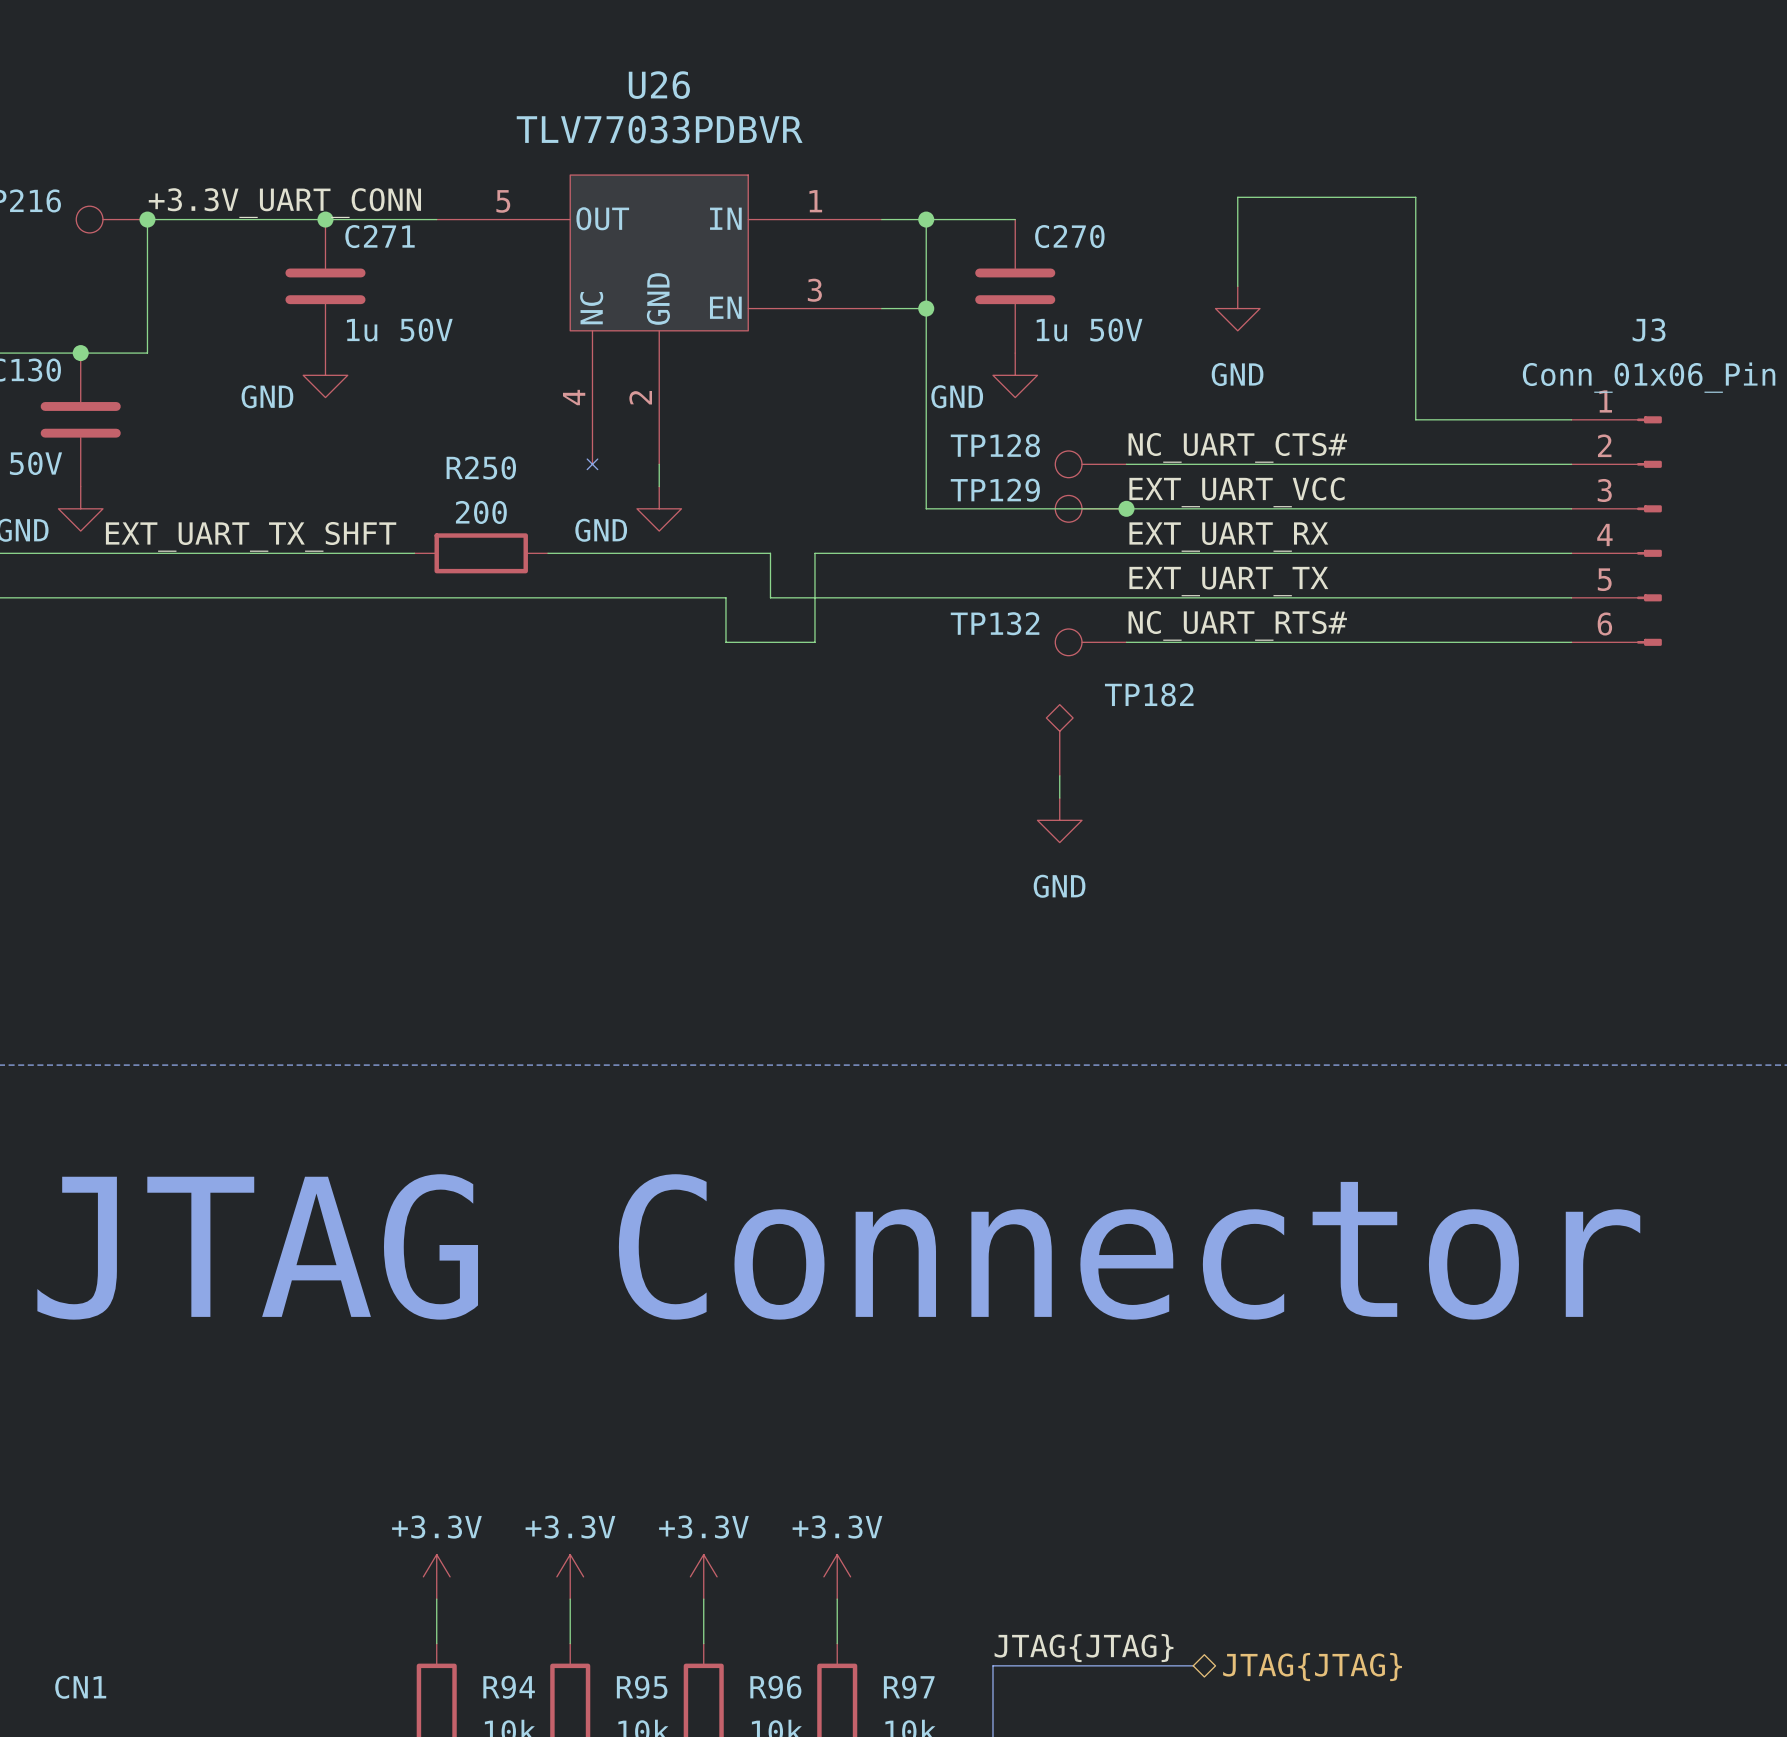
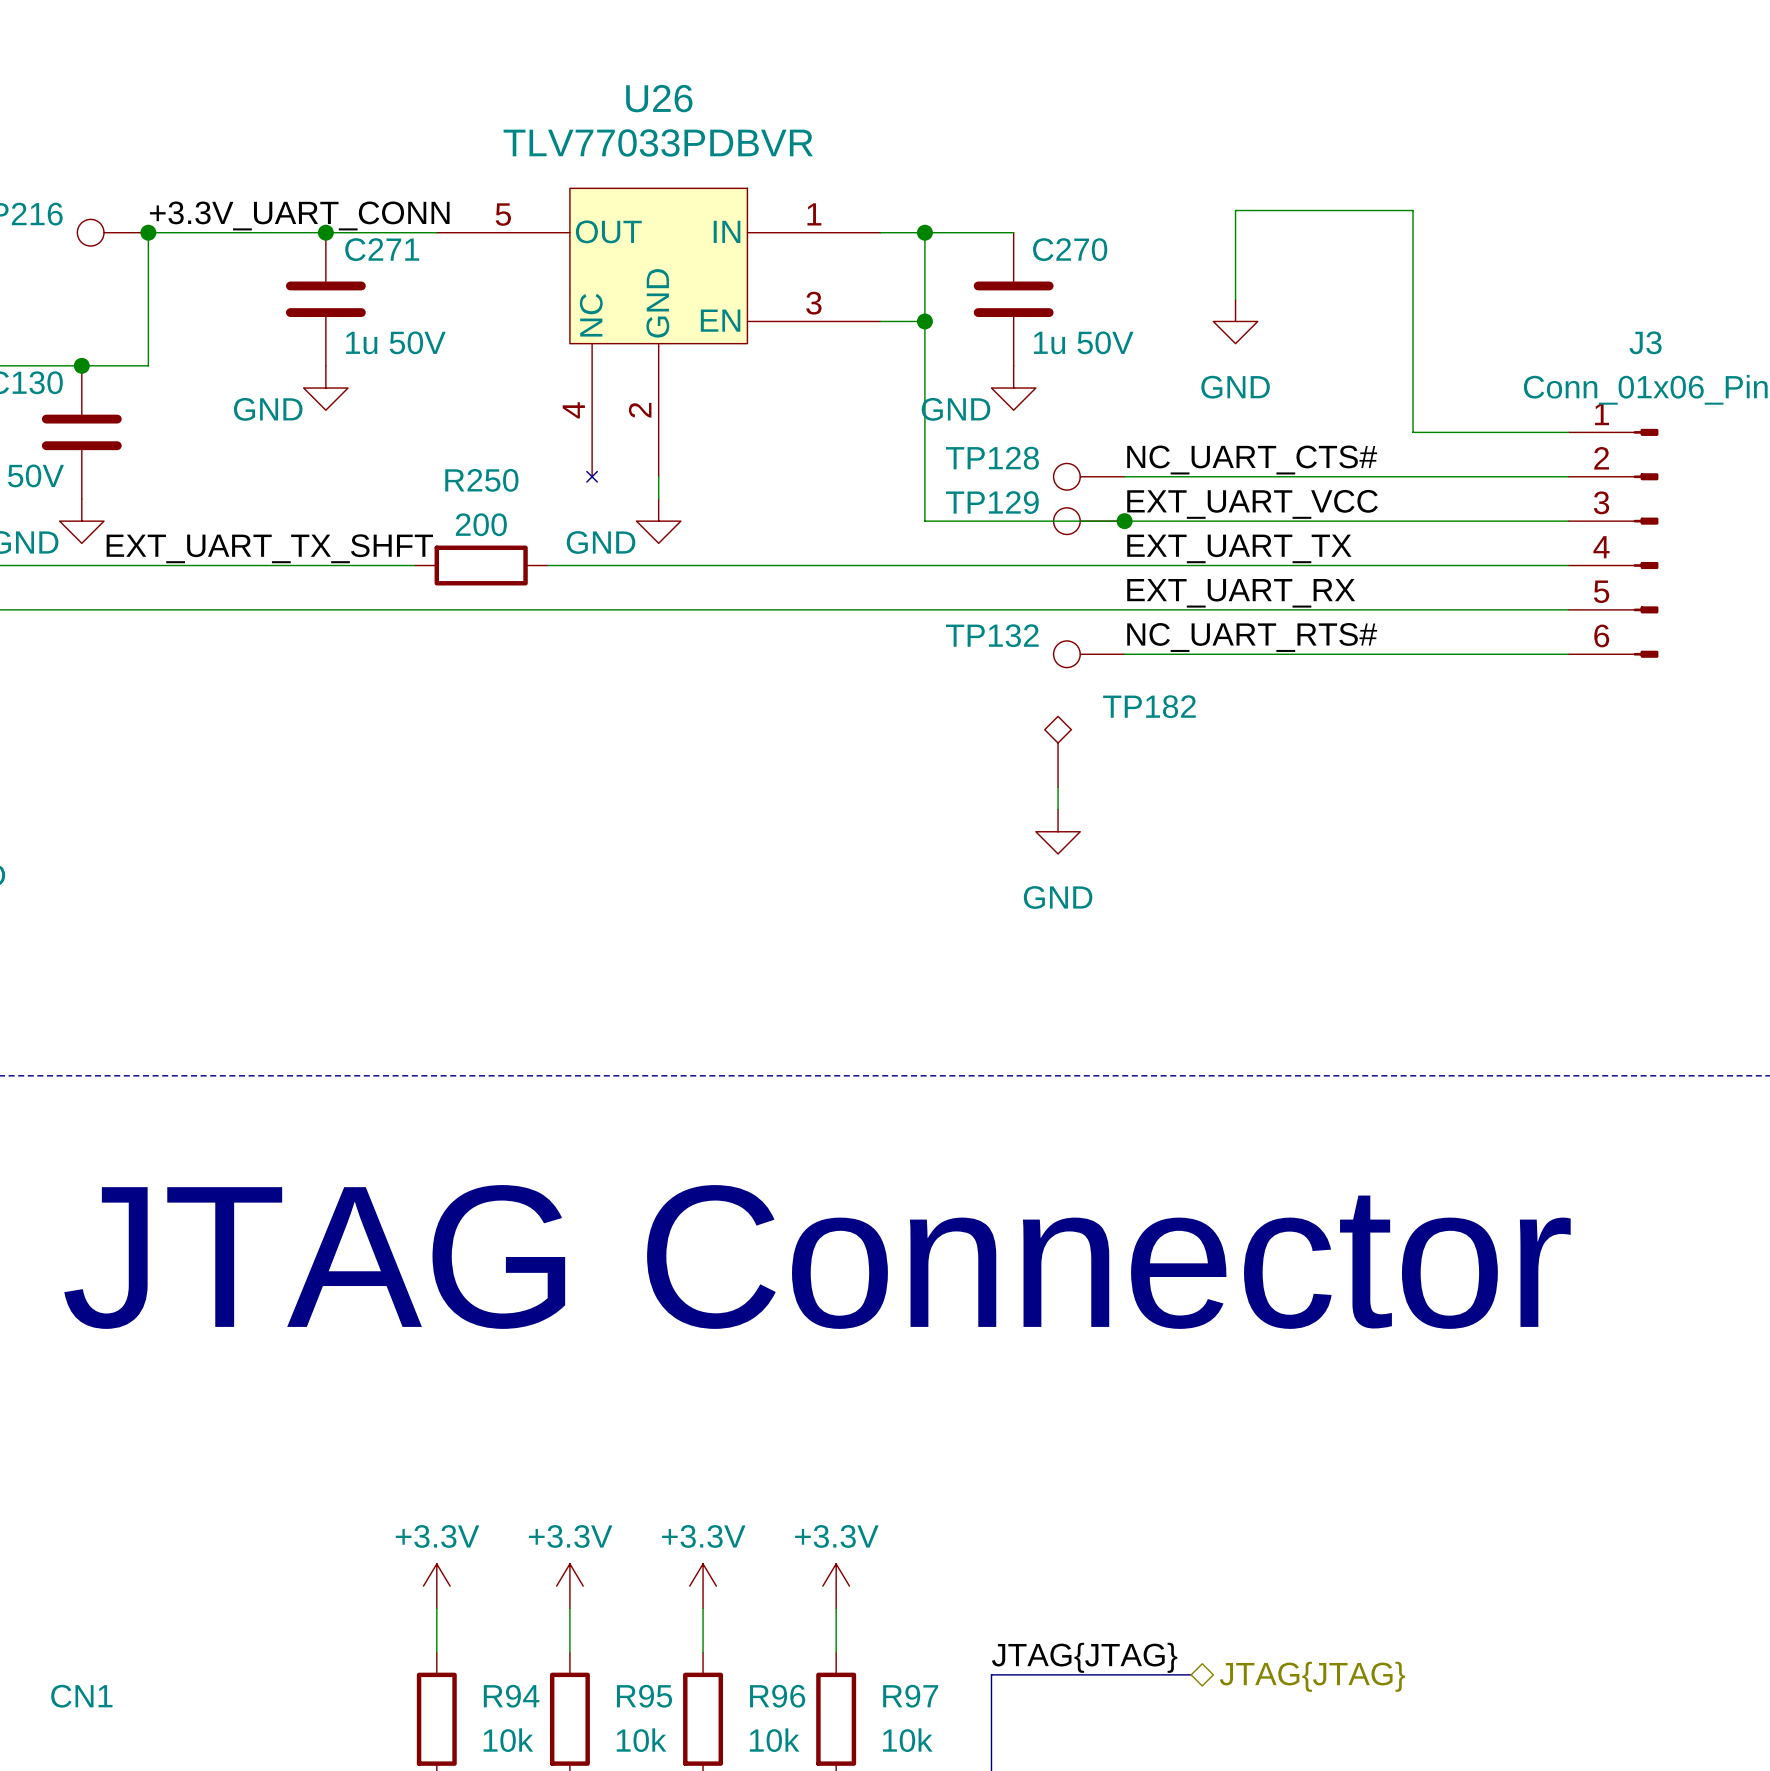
label: EXT_UART_RX (1228, 537) -> EXT_UART_TX (1239, 548)
wire: (770, 553) (770, 597) -> (769, 565) (813, 565)
wire: (814, 553) (814, 642) (725, 642) (725, 597) -> (769, 609) (725, 609)
label: EXT_UART_TX (1228, 581) -> EXT_UART_RX (1241, 593)

